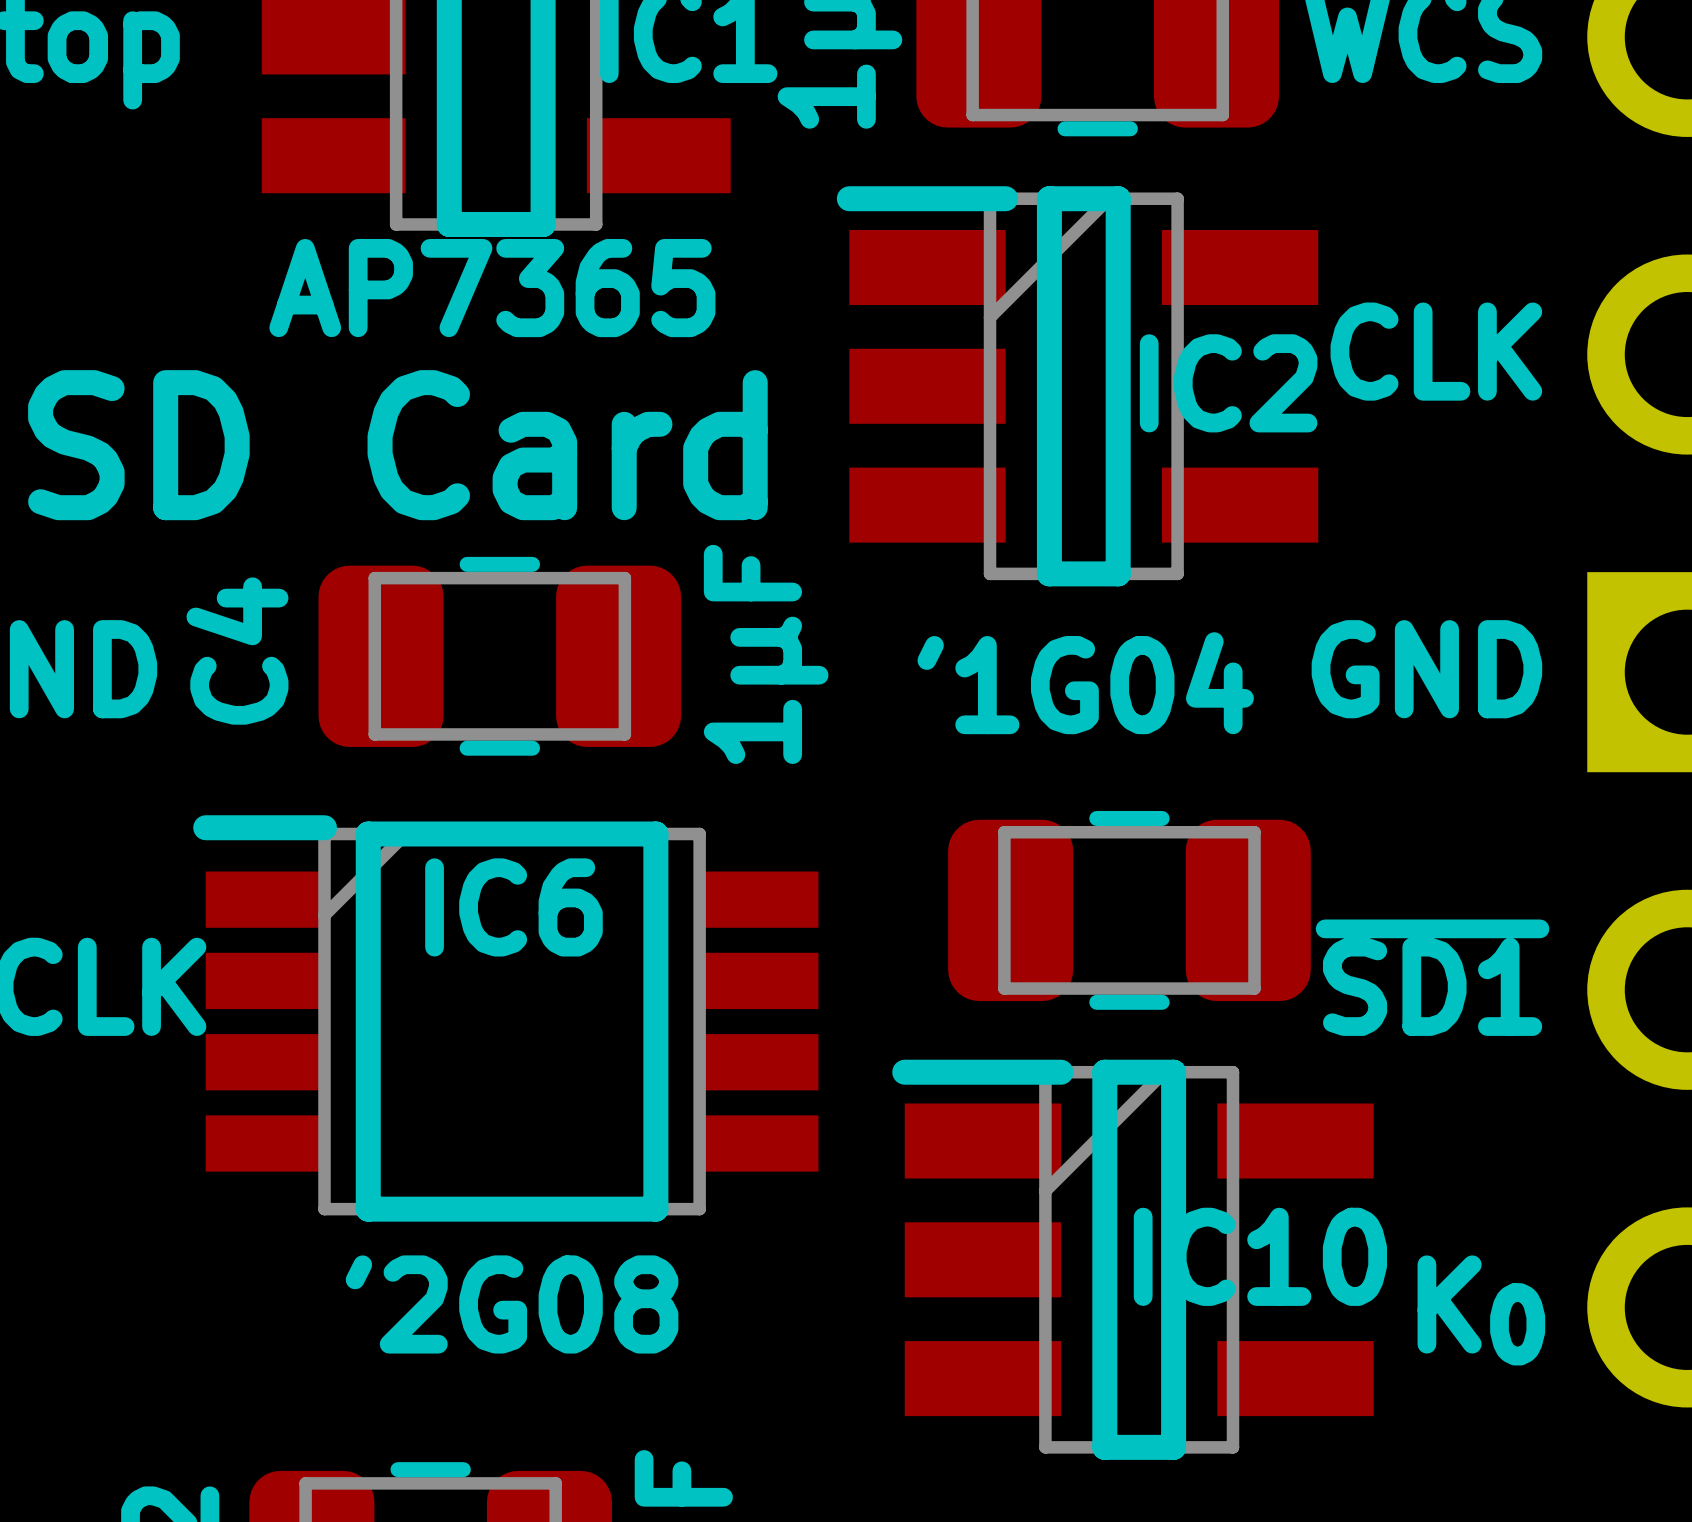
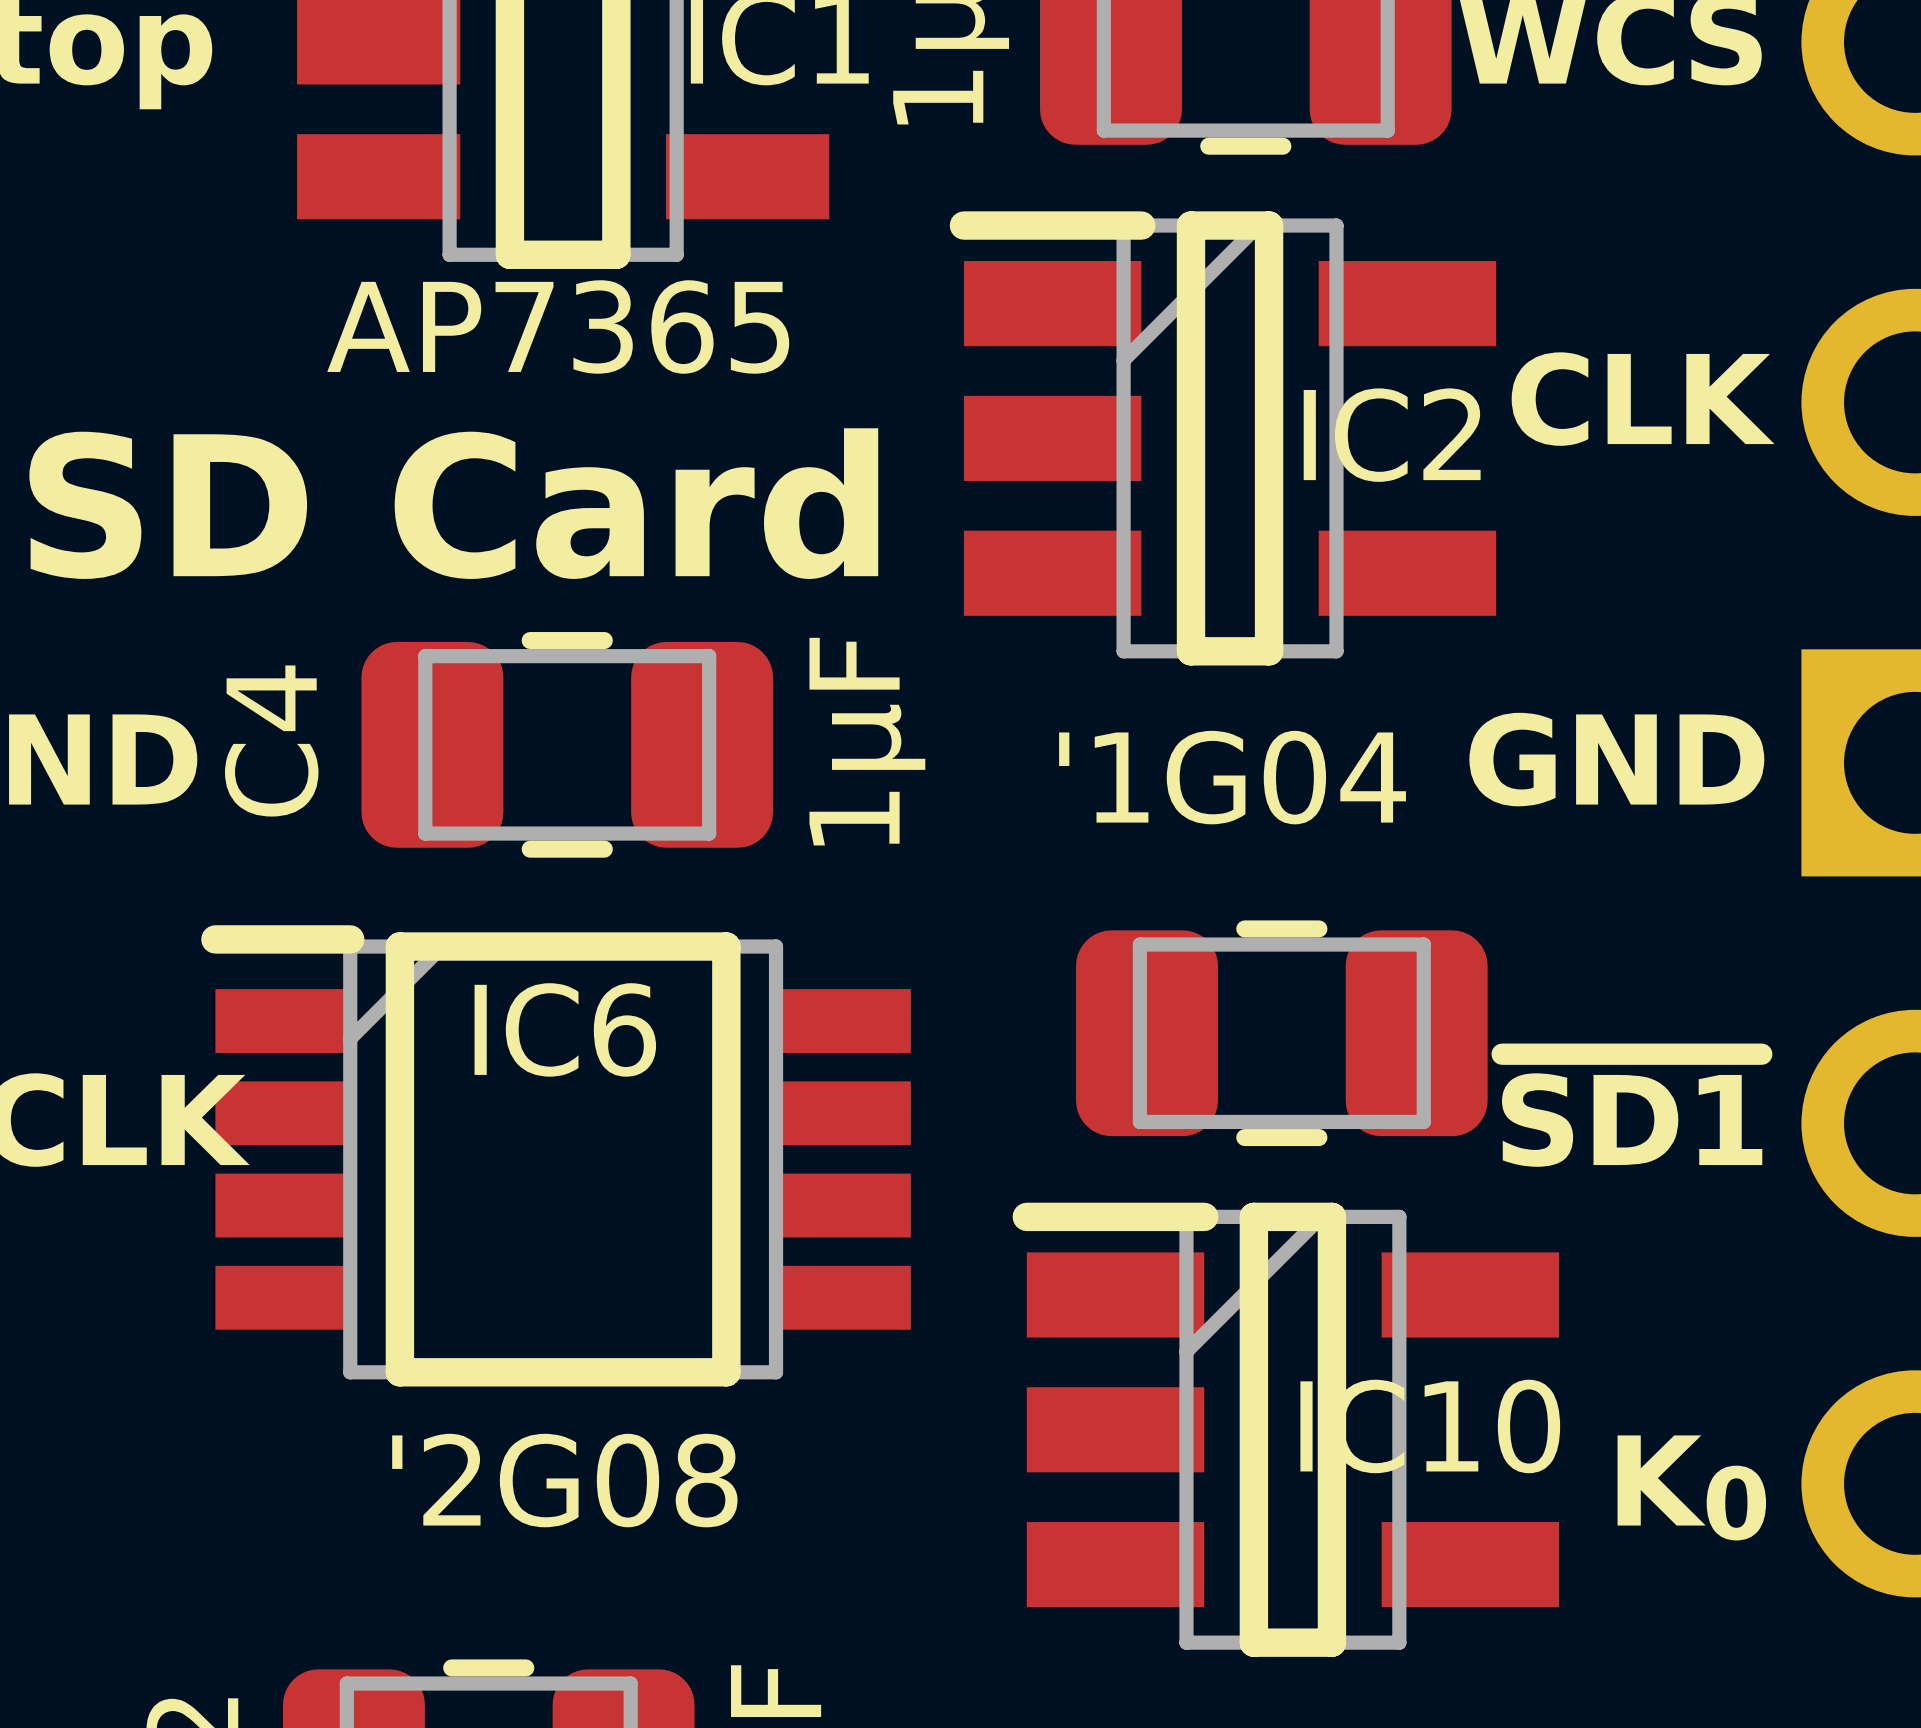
IC6 position: (505, 1018) -> (556, 1155)

